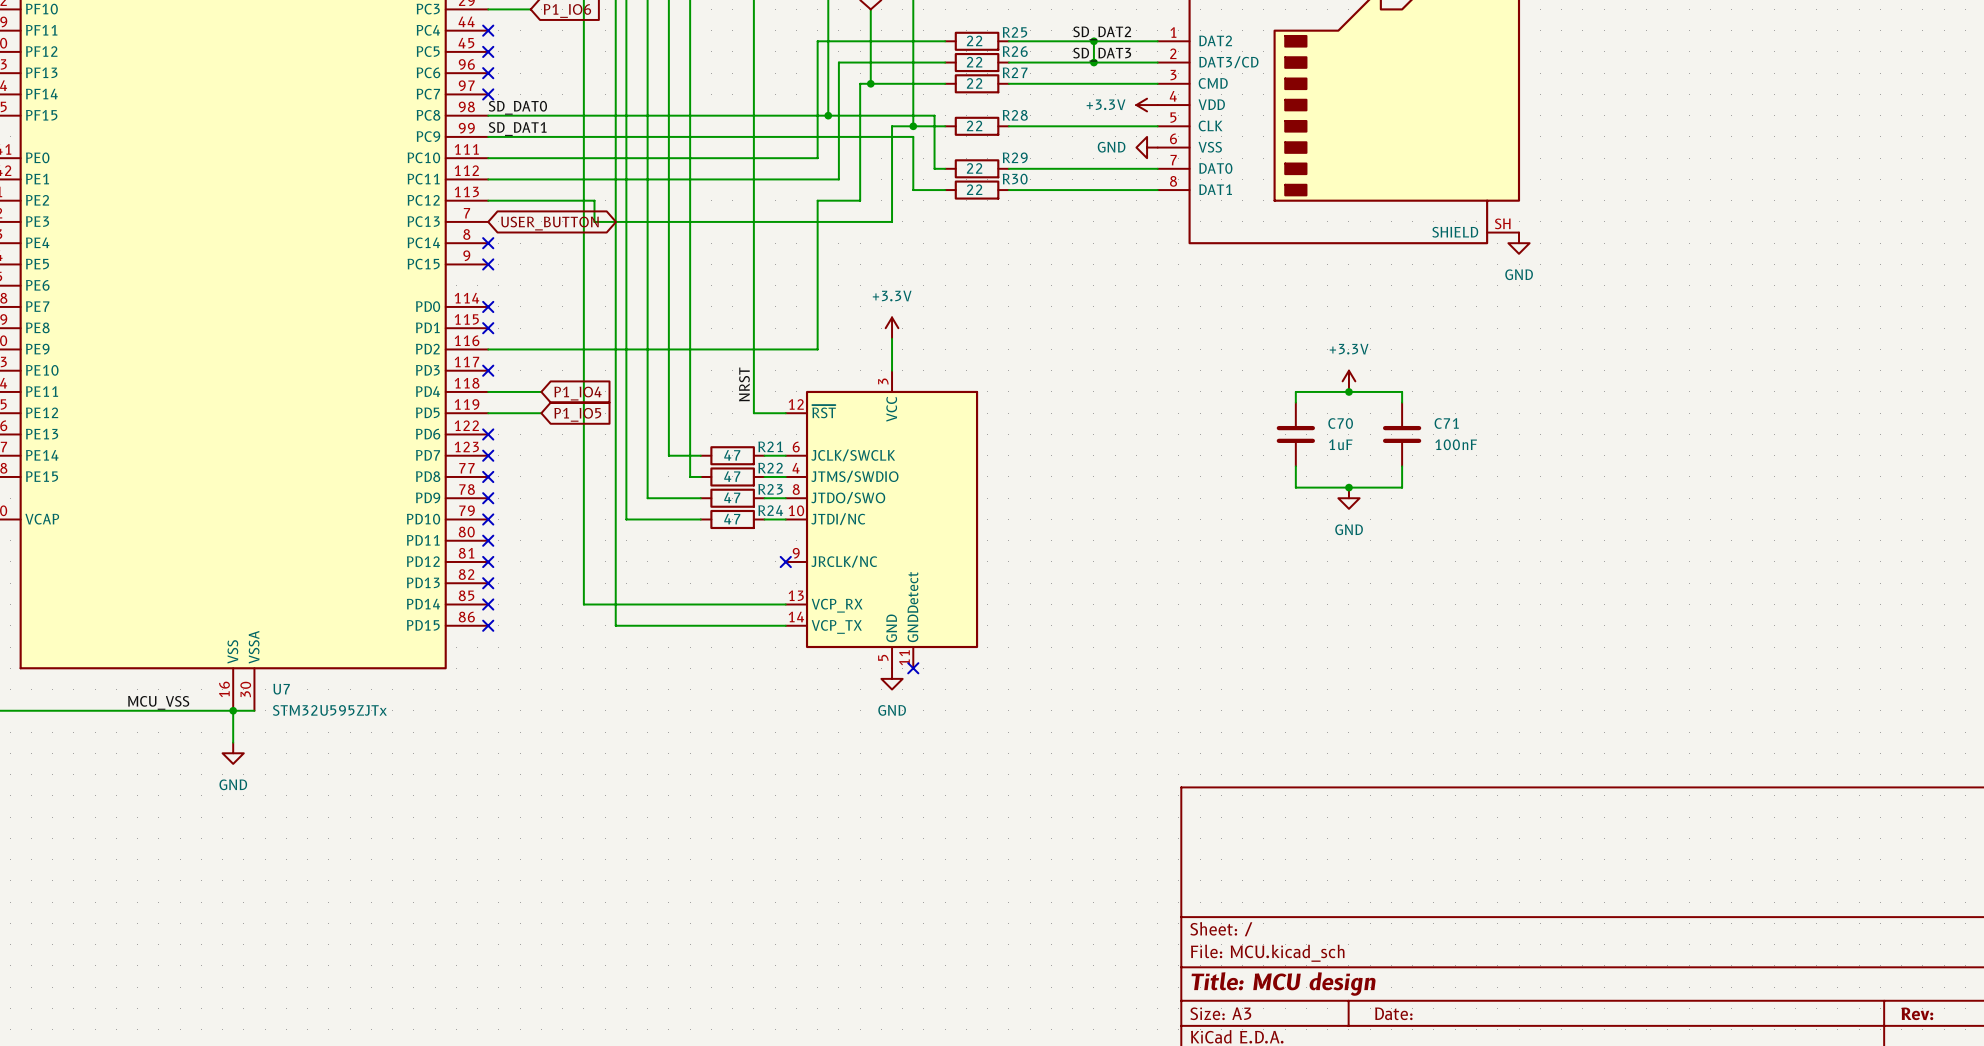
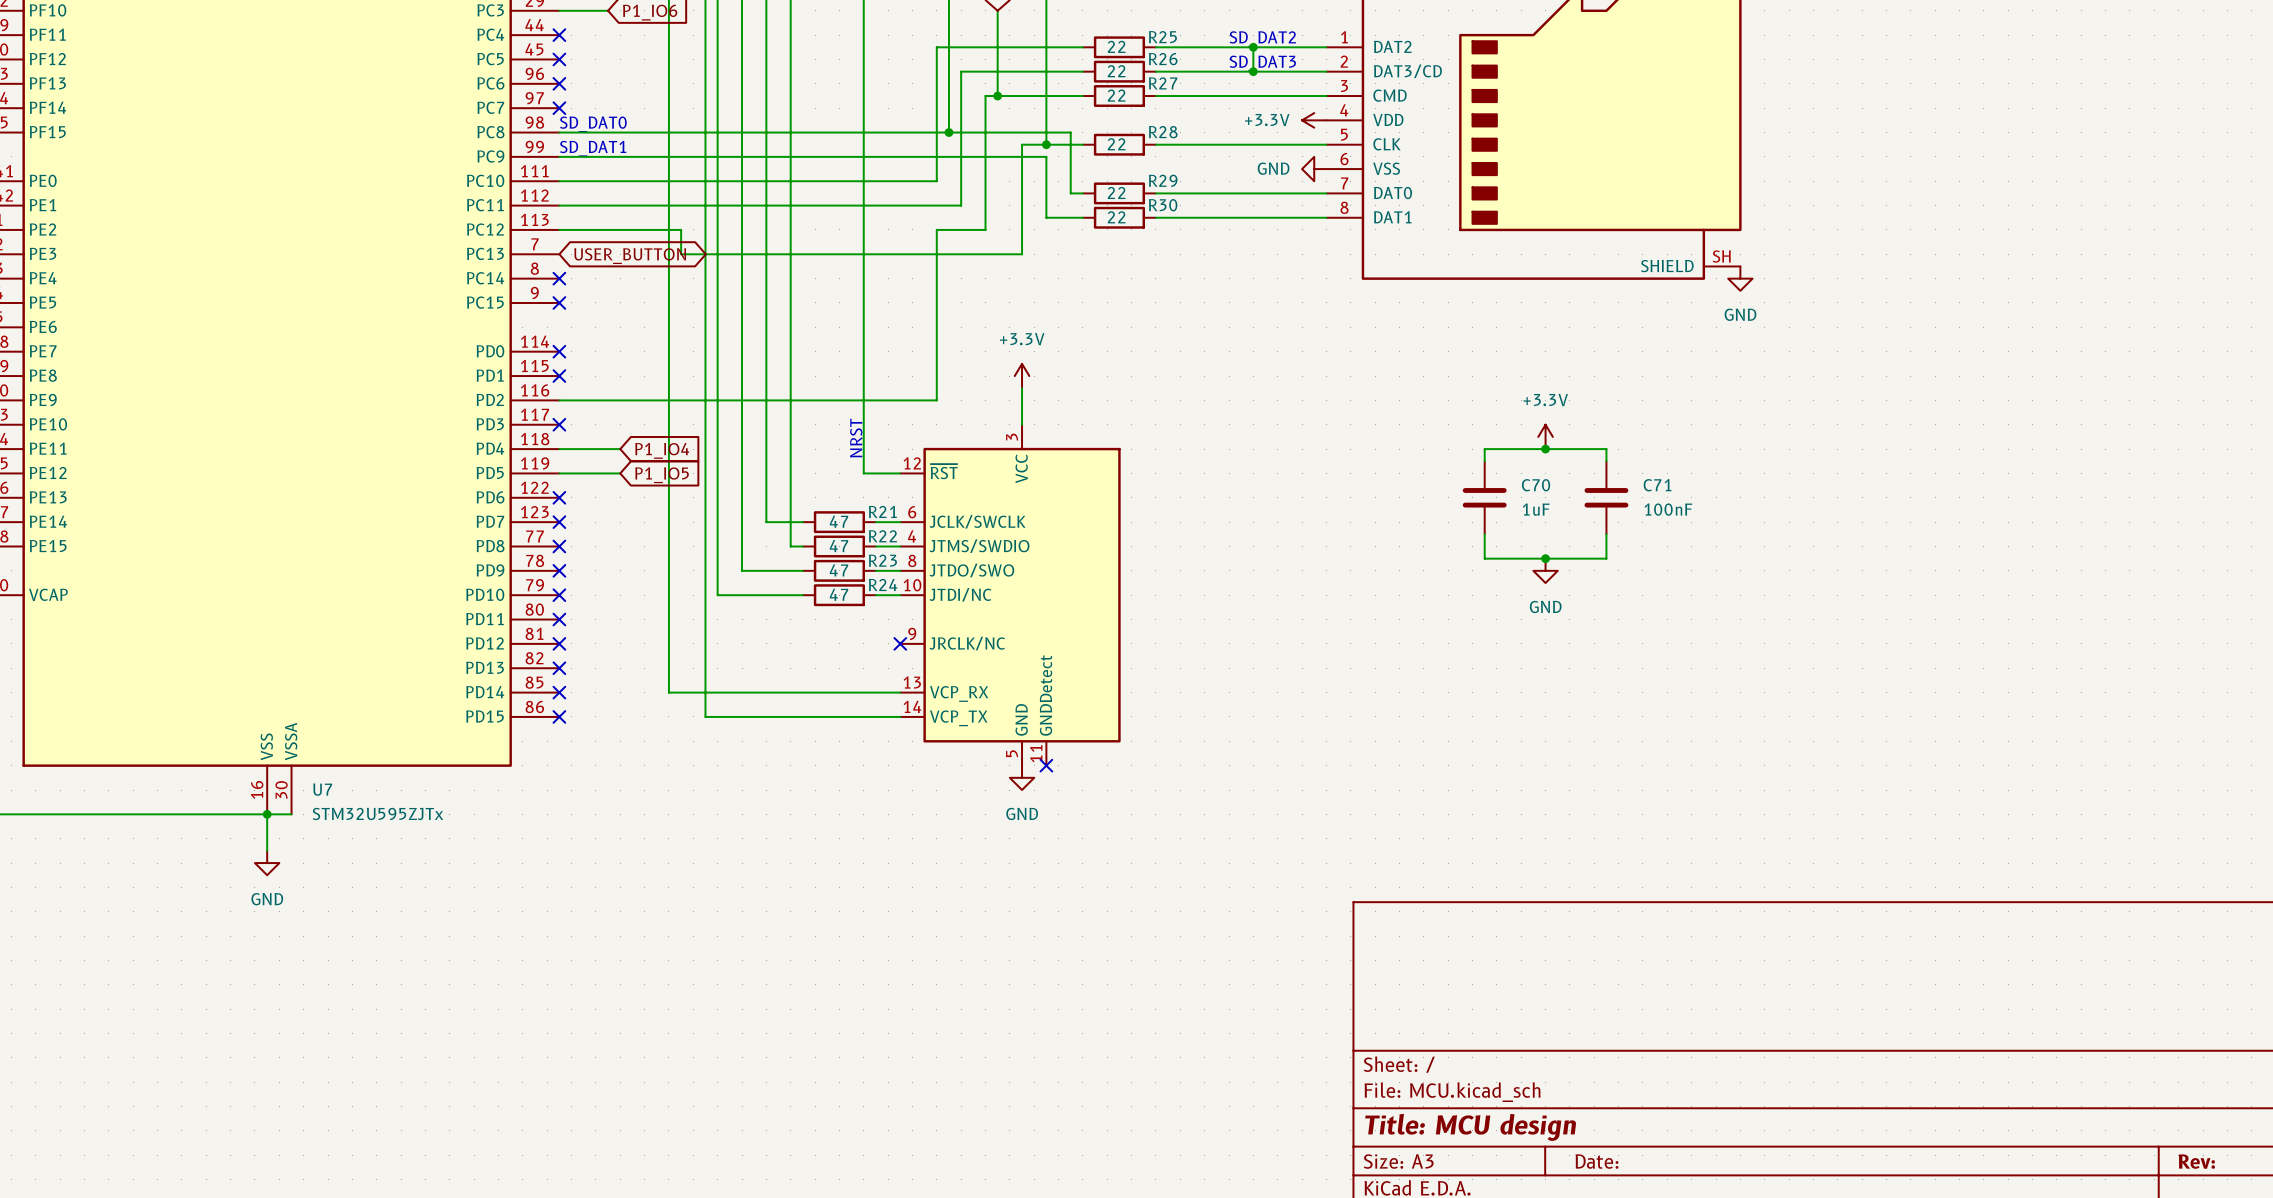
label: SD_DAT2 (1102, 33) -> none
text: none -> SD_DAT2 (1262, 39)
label: SD_DAT3 (1102, 54) -> none
text: none -> SD_DAT3 (1262, 63)
label: SD_DAT0 (517, 107) -> none
text: none -> SD_DAT0 (593, 124)
label: SD_DAT1 (517, 129) -> none
text: none -> SD_DAT1 (593, 148)
text: none -> NRST (856, 438)
label: NRST (744, 384) -> none
label: MCU_VSS (158, 702) -> none

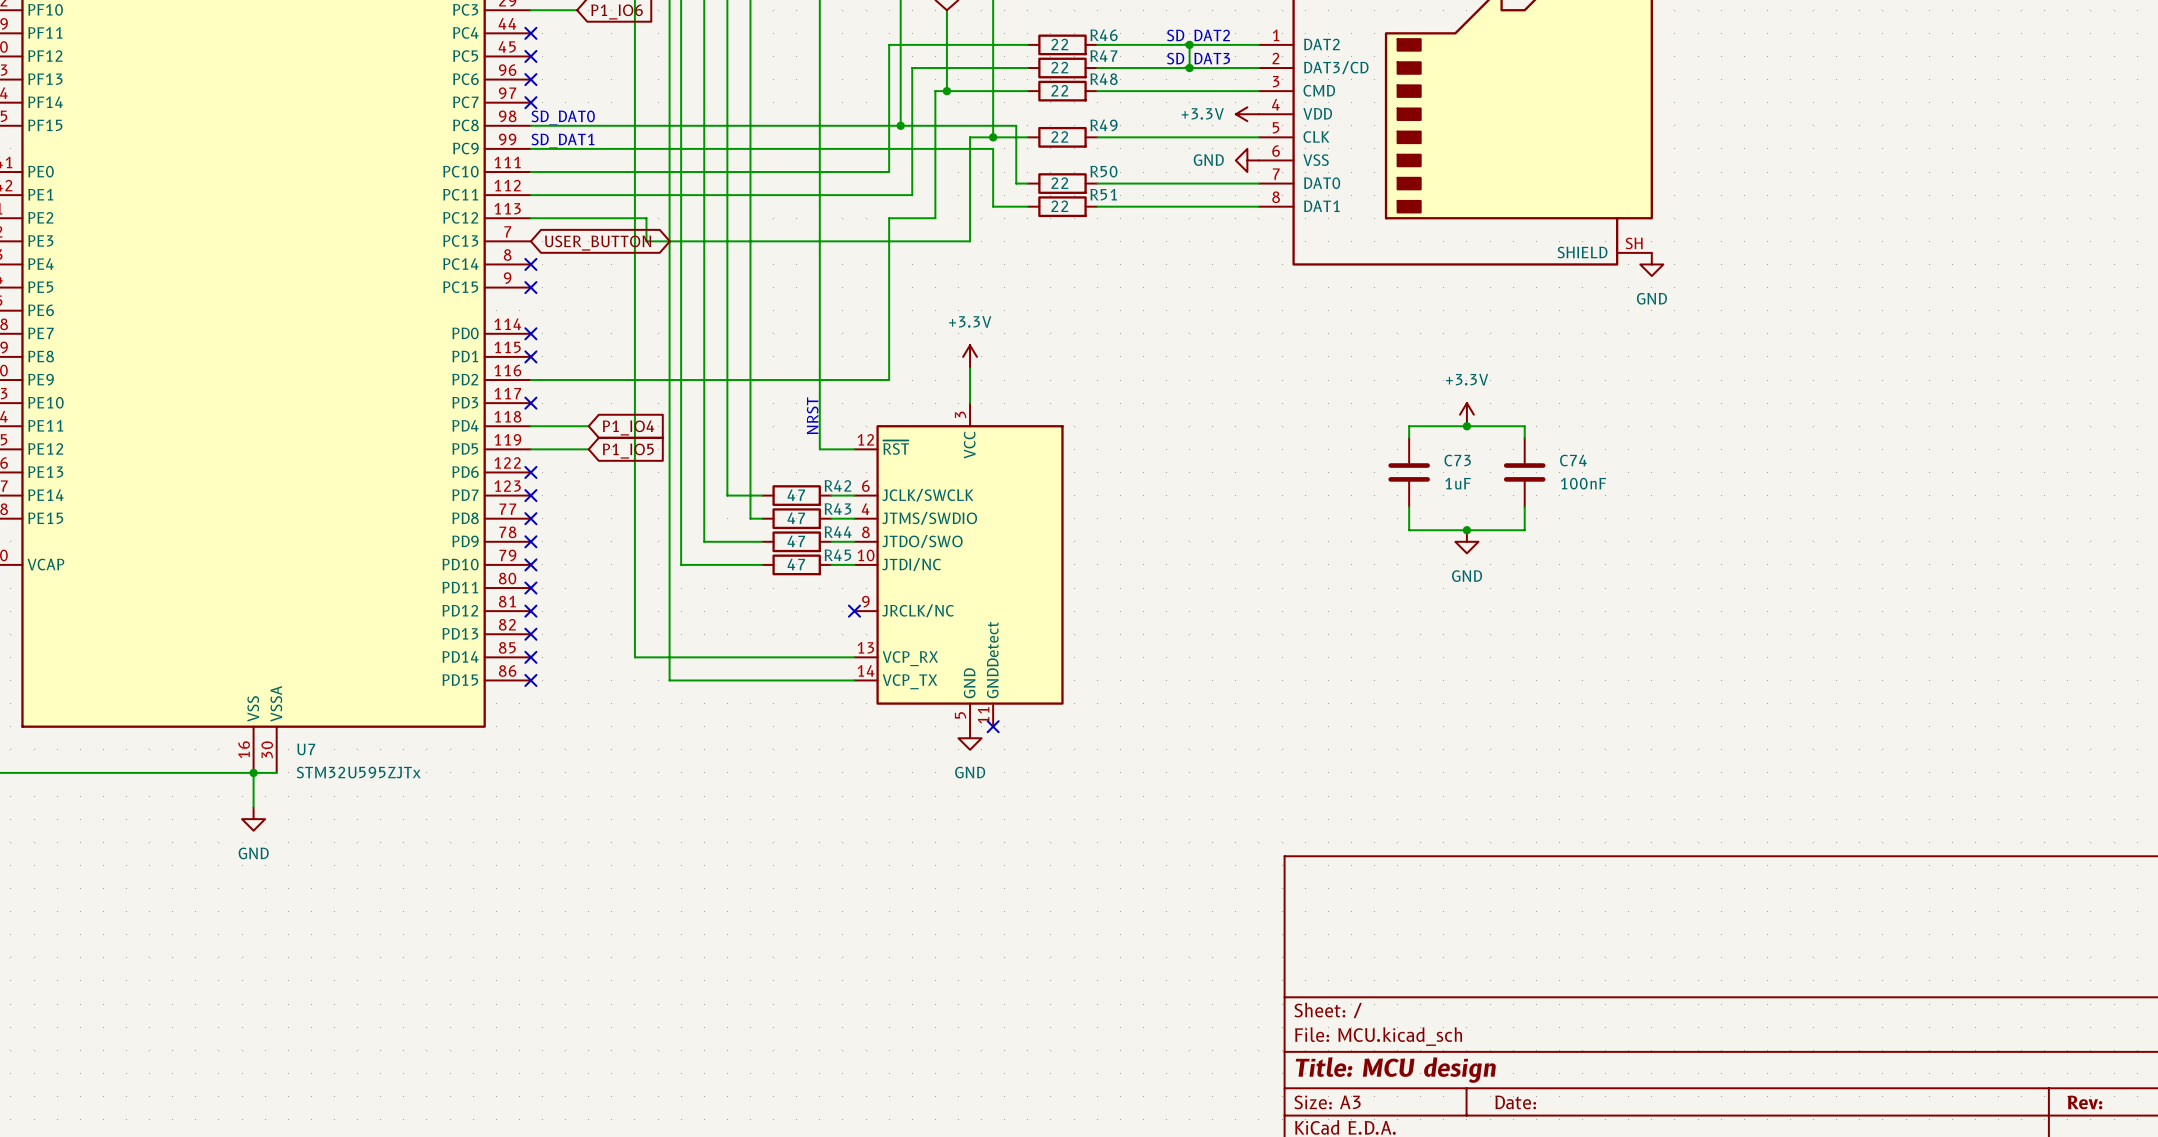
R25 name: R25 (1162, 37) -> R46 (1104, 35)
R26 name: R26 (1163, 59) -> R47 (1103, 56)
R27 name: R27 (1163, 83) -> R48 (1104, 79)
R28 name: R28 (1163, 132) -> R49 (1103, 125)
R29 name: R29 (1163, 180) -> R50 (1103, 171)
R30 name: R30 (1163, 205) -> R51 (1103, 194)
C70 name: C70 (1536, 485) -> C73 (1457, 460)
C71 name: C71 (1657, 485) -> C74 (1573, 460)
R21 name: R21 (882, 511) -> R42 (837, 485)
R22 name: R22 (882, 536) -> R43 (837, 509)
R23 name: R23 (882, 560) -> R44 (838, 532)
R24 name: R24 (883, 585) -> R45 (837, 555)

